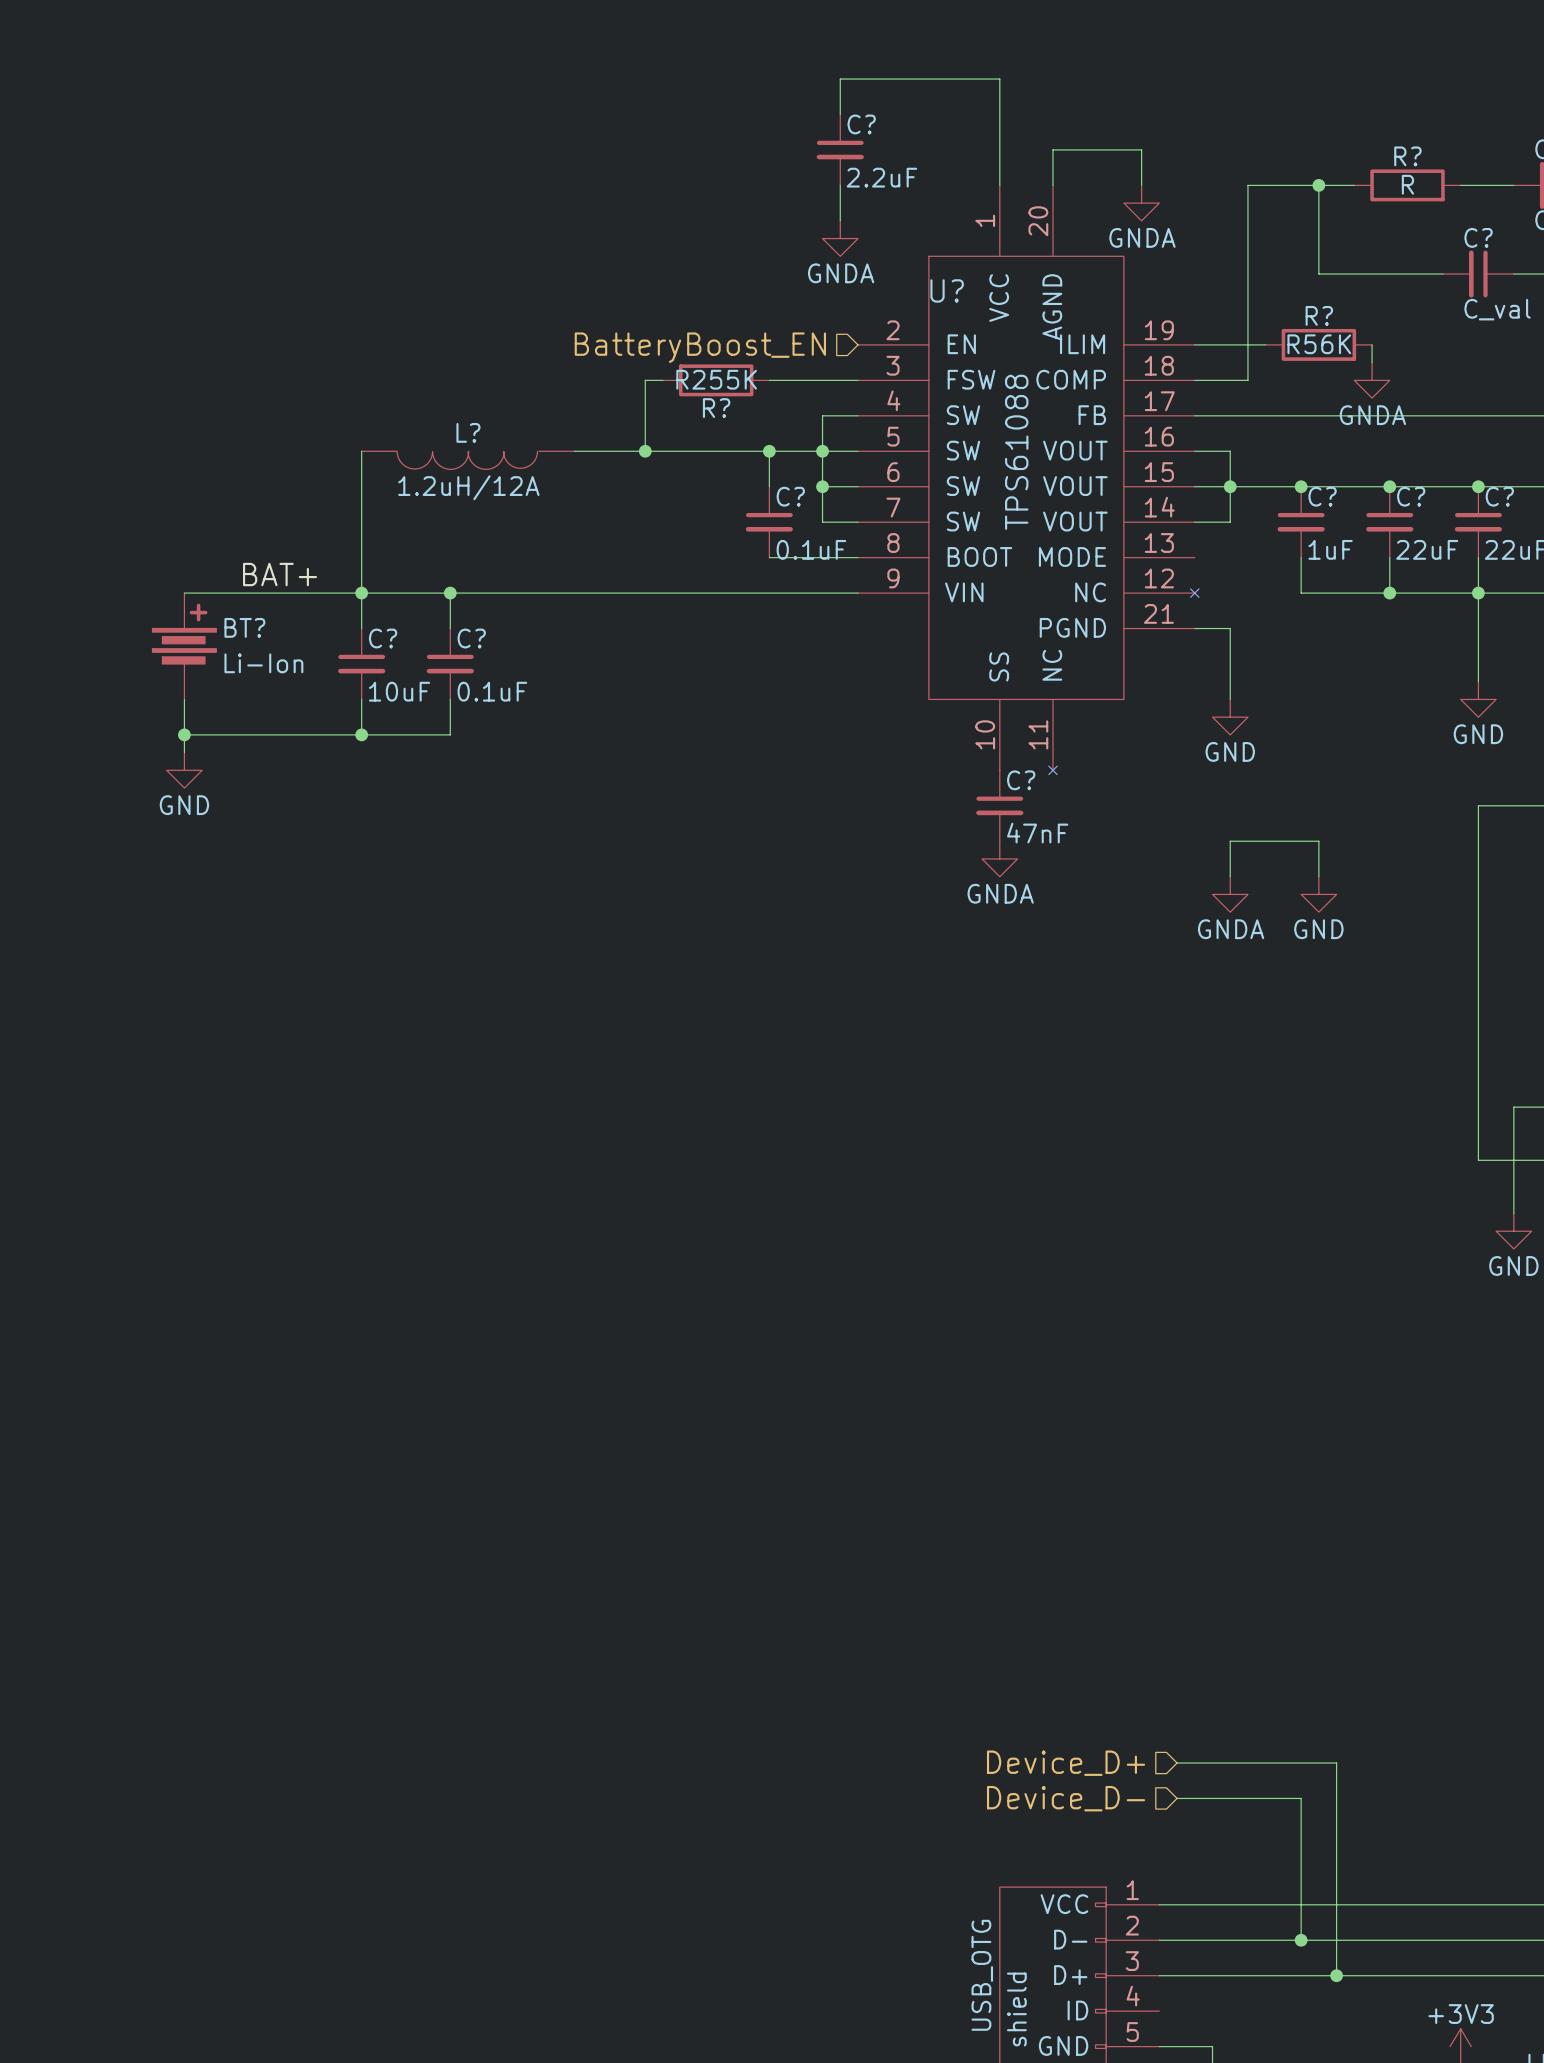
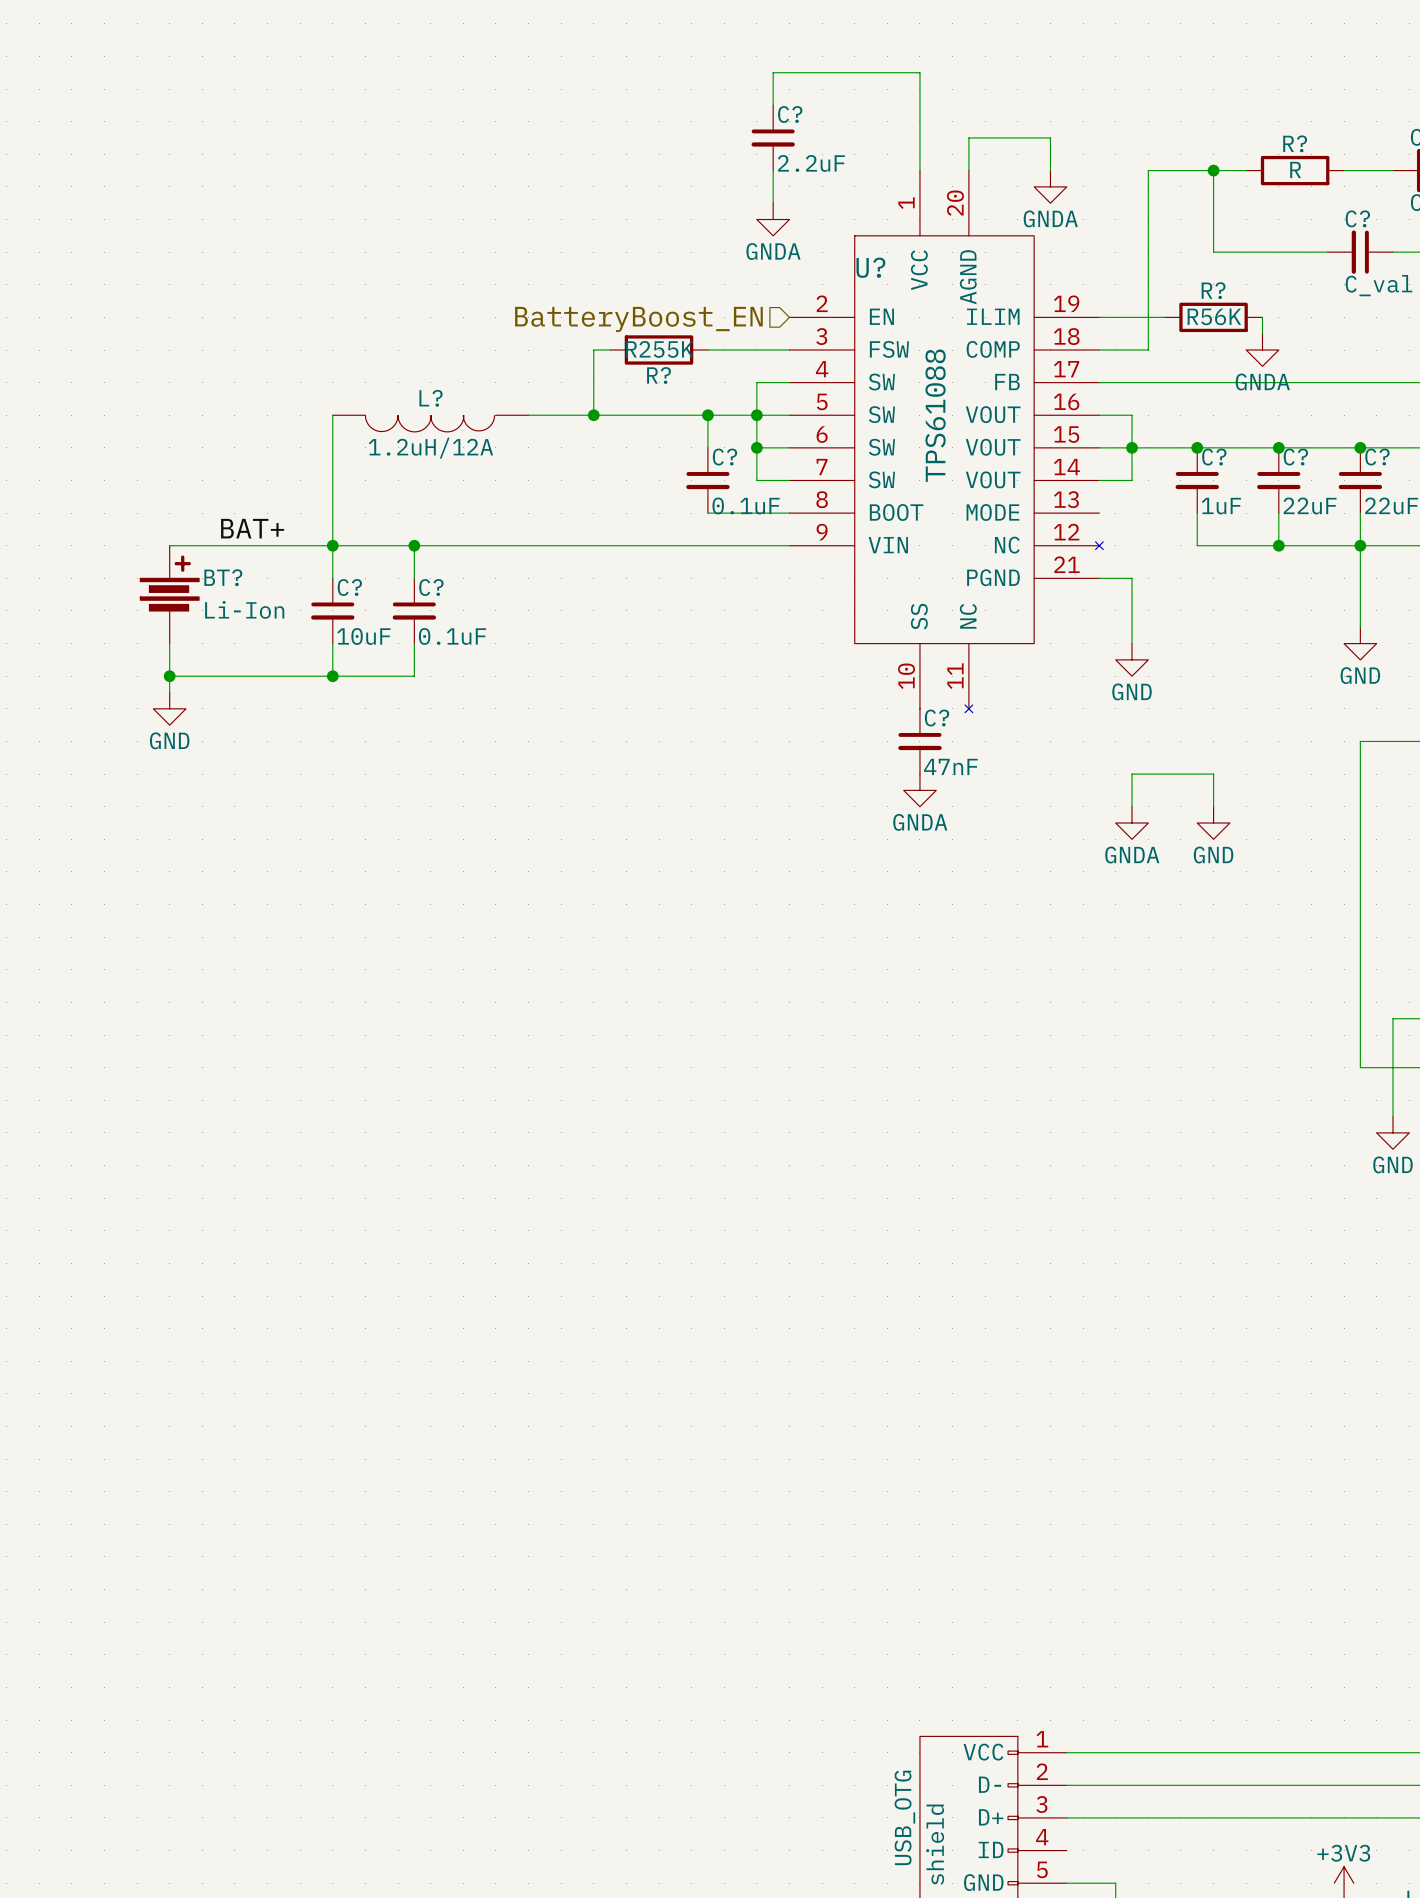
hierarchical label: Device_D+ (1066, 1763) -> none
wire: (1177, 1763) (1336, 1763) (1336, 1975) -> none
hierarchical label: Device_D- (1066, 1798) -> none
wire: (1177, 1798) (1301, 1798) (1301, 1940) -> none
junction: (1301, 1940) -> none
junction: (1336, 1975) -> none

